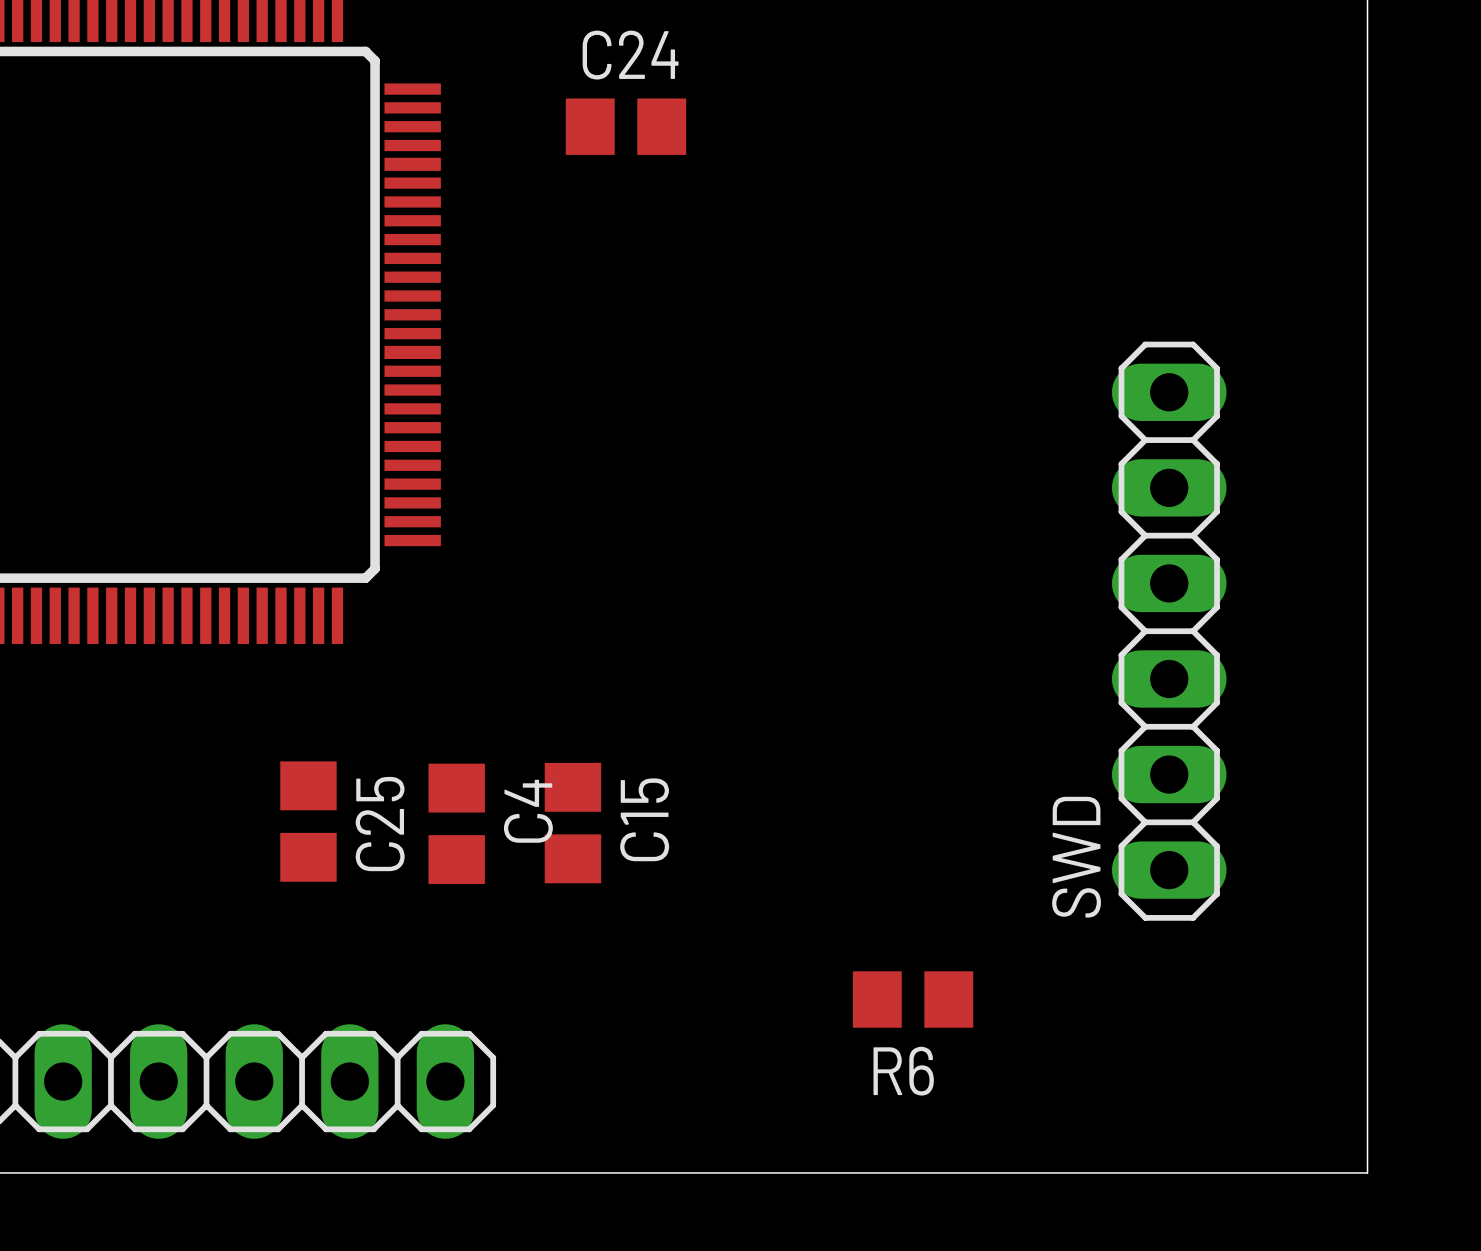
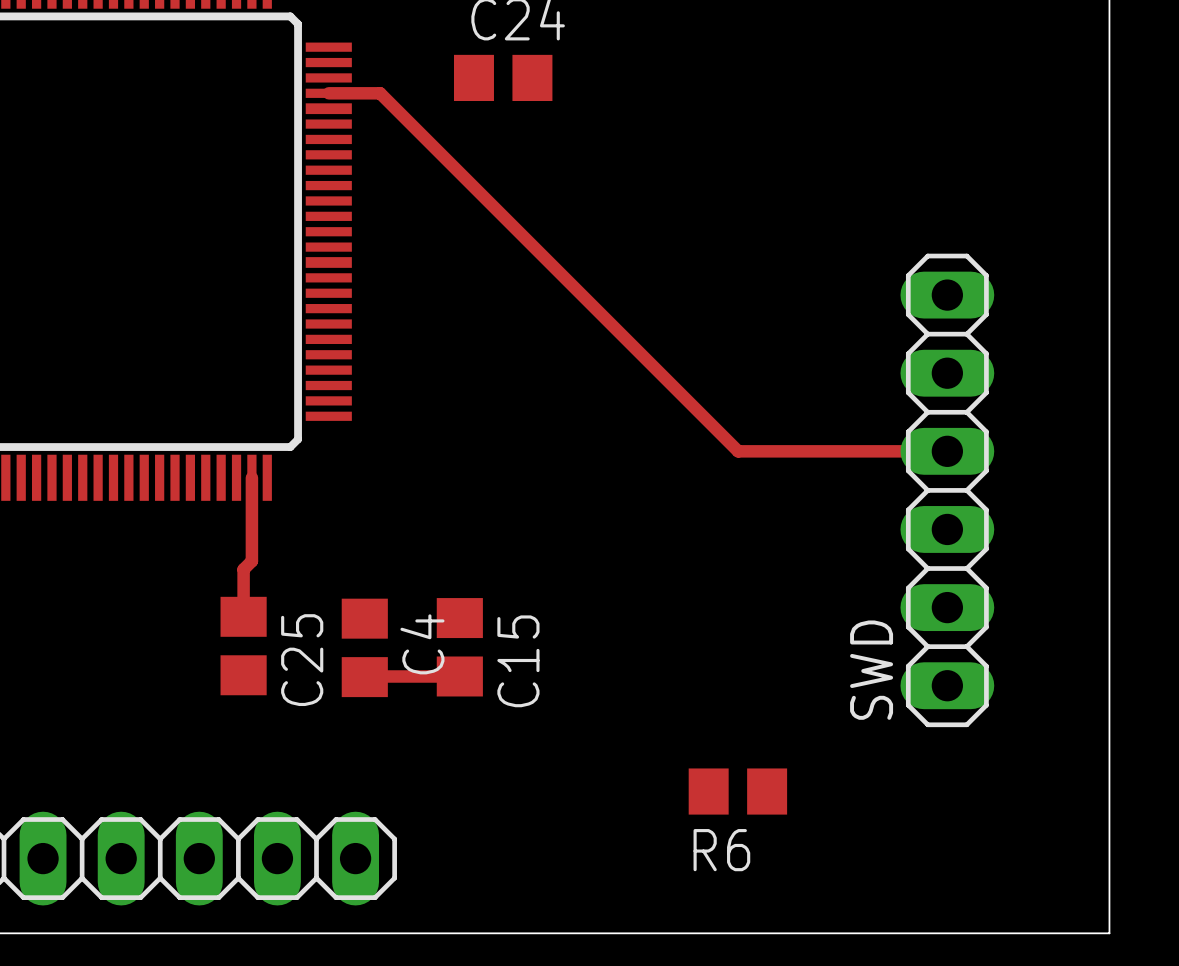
track: none -> (328, 93) (380, 93) (738, 451) (947, 451)
track: none -> (251, 477) (251, 561) (243, 569) (243, 616)
track: none -> (364, 676) (459, 676)

